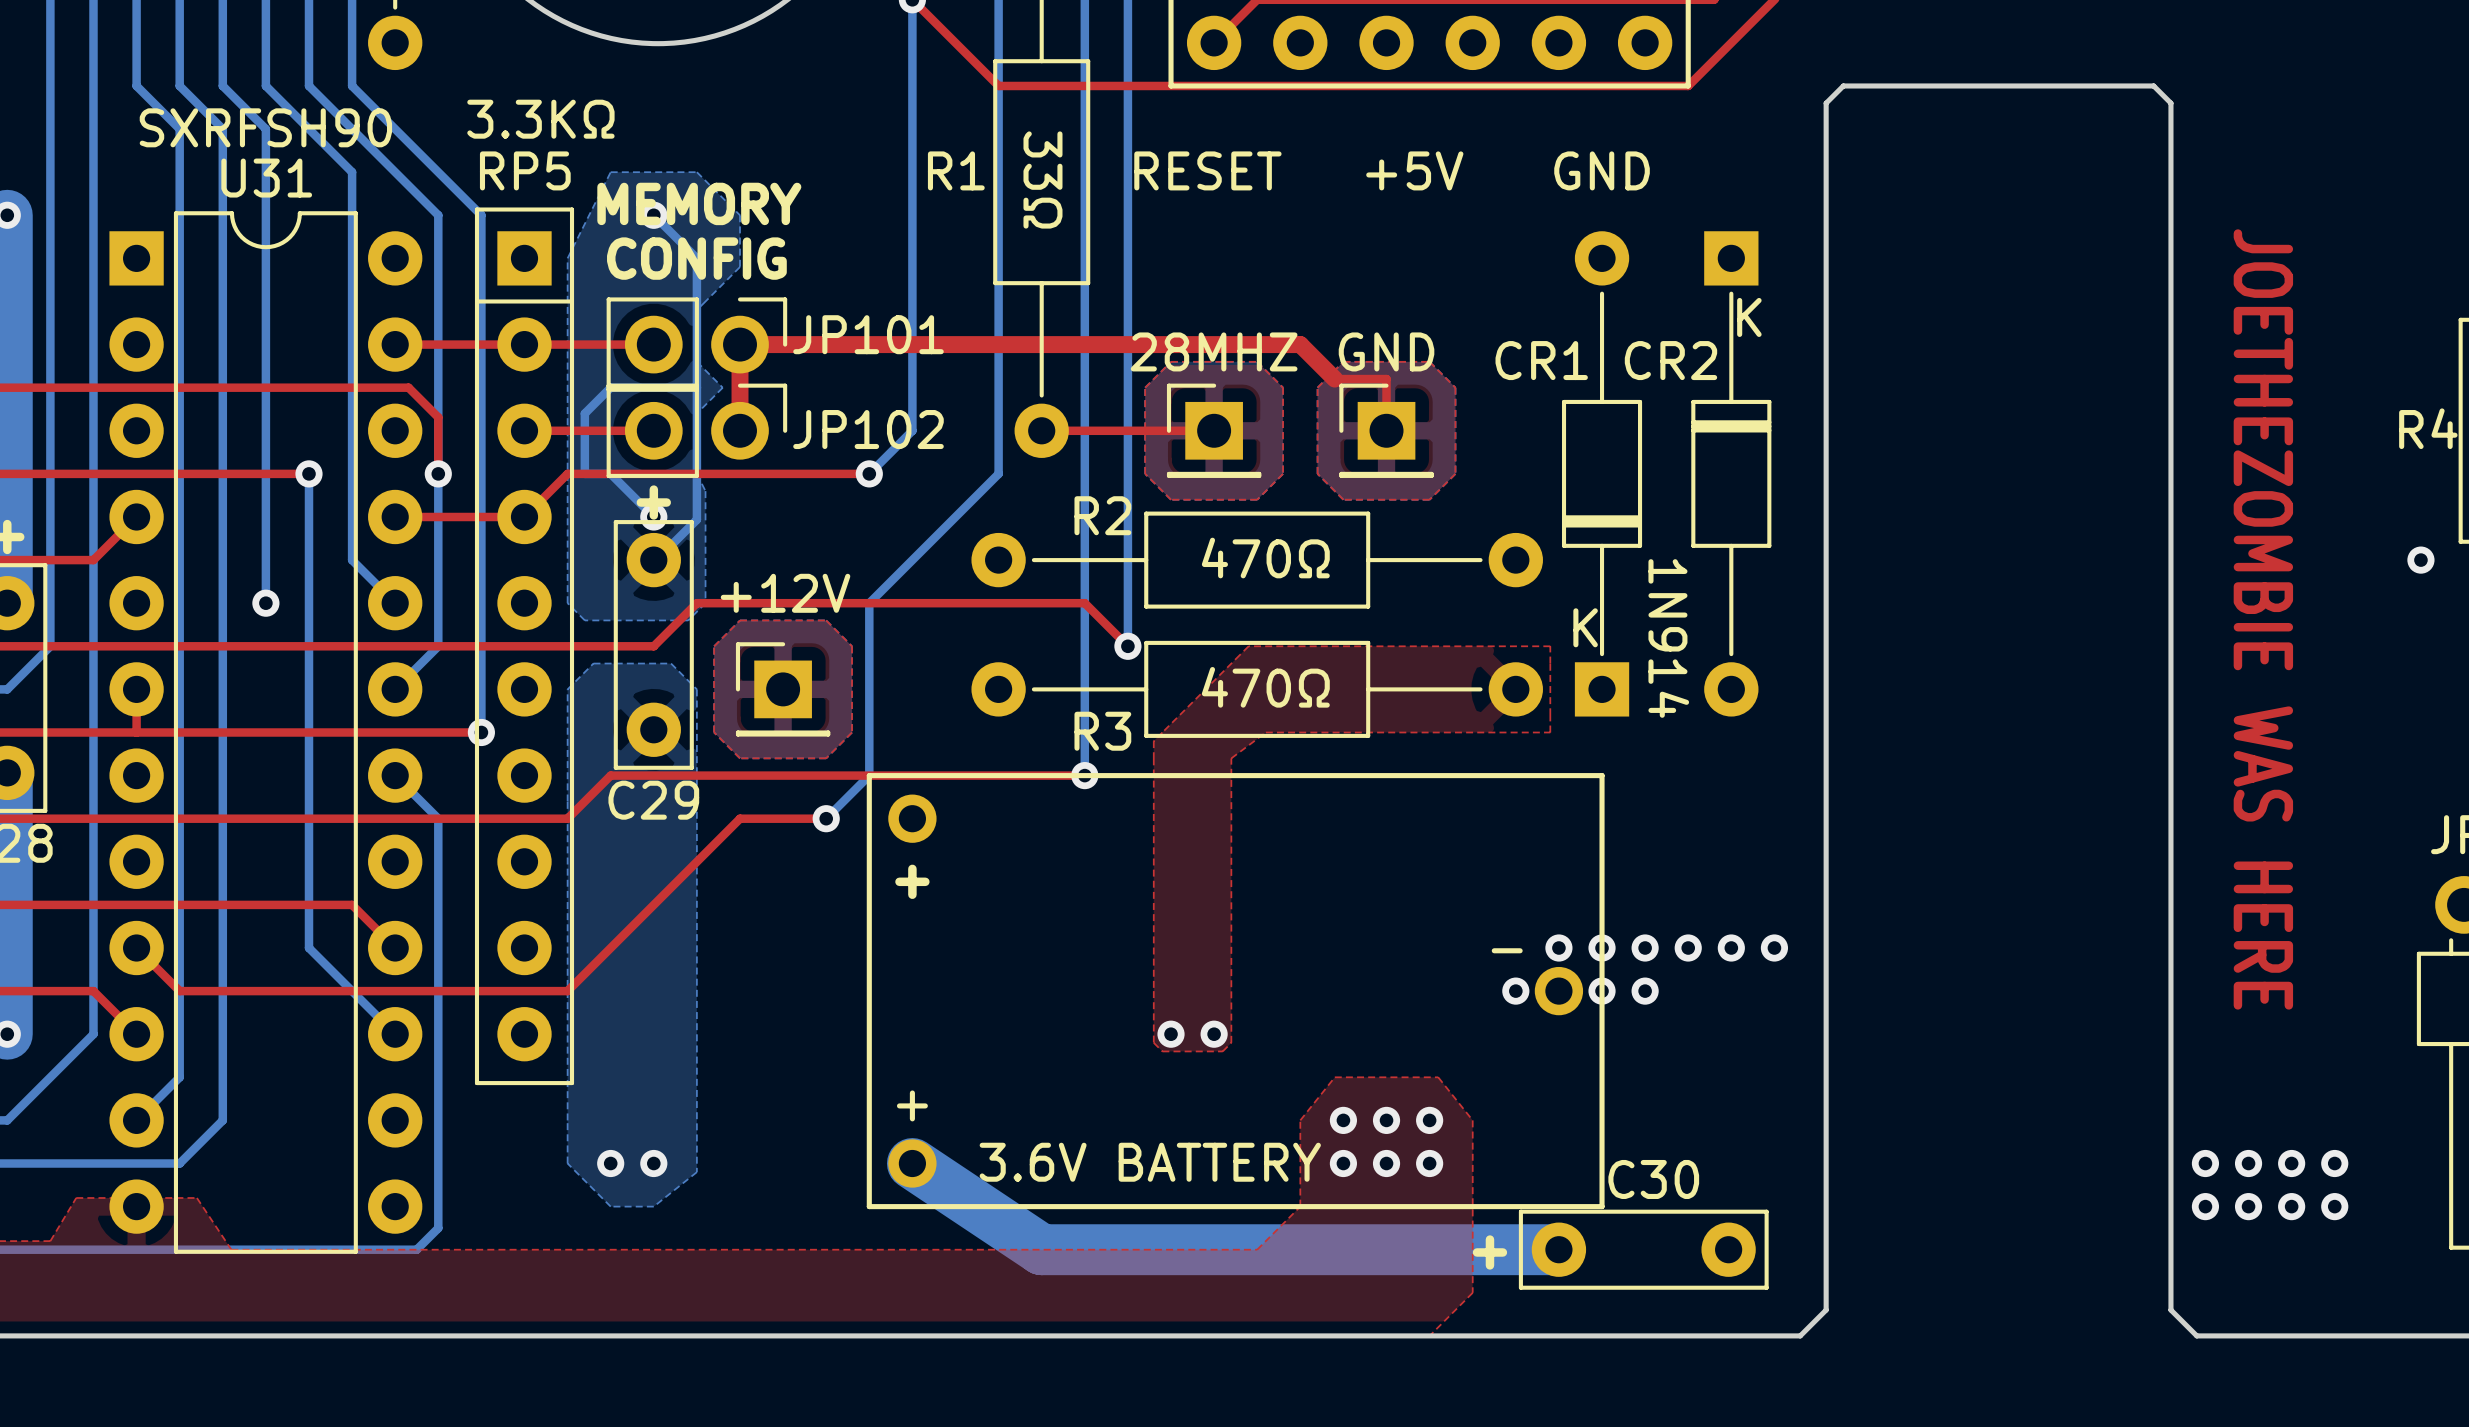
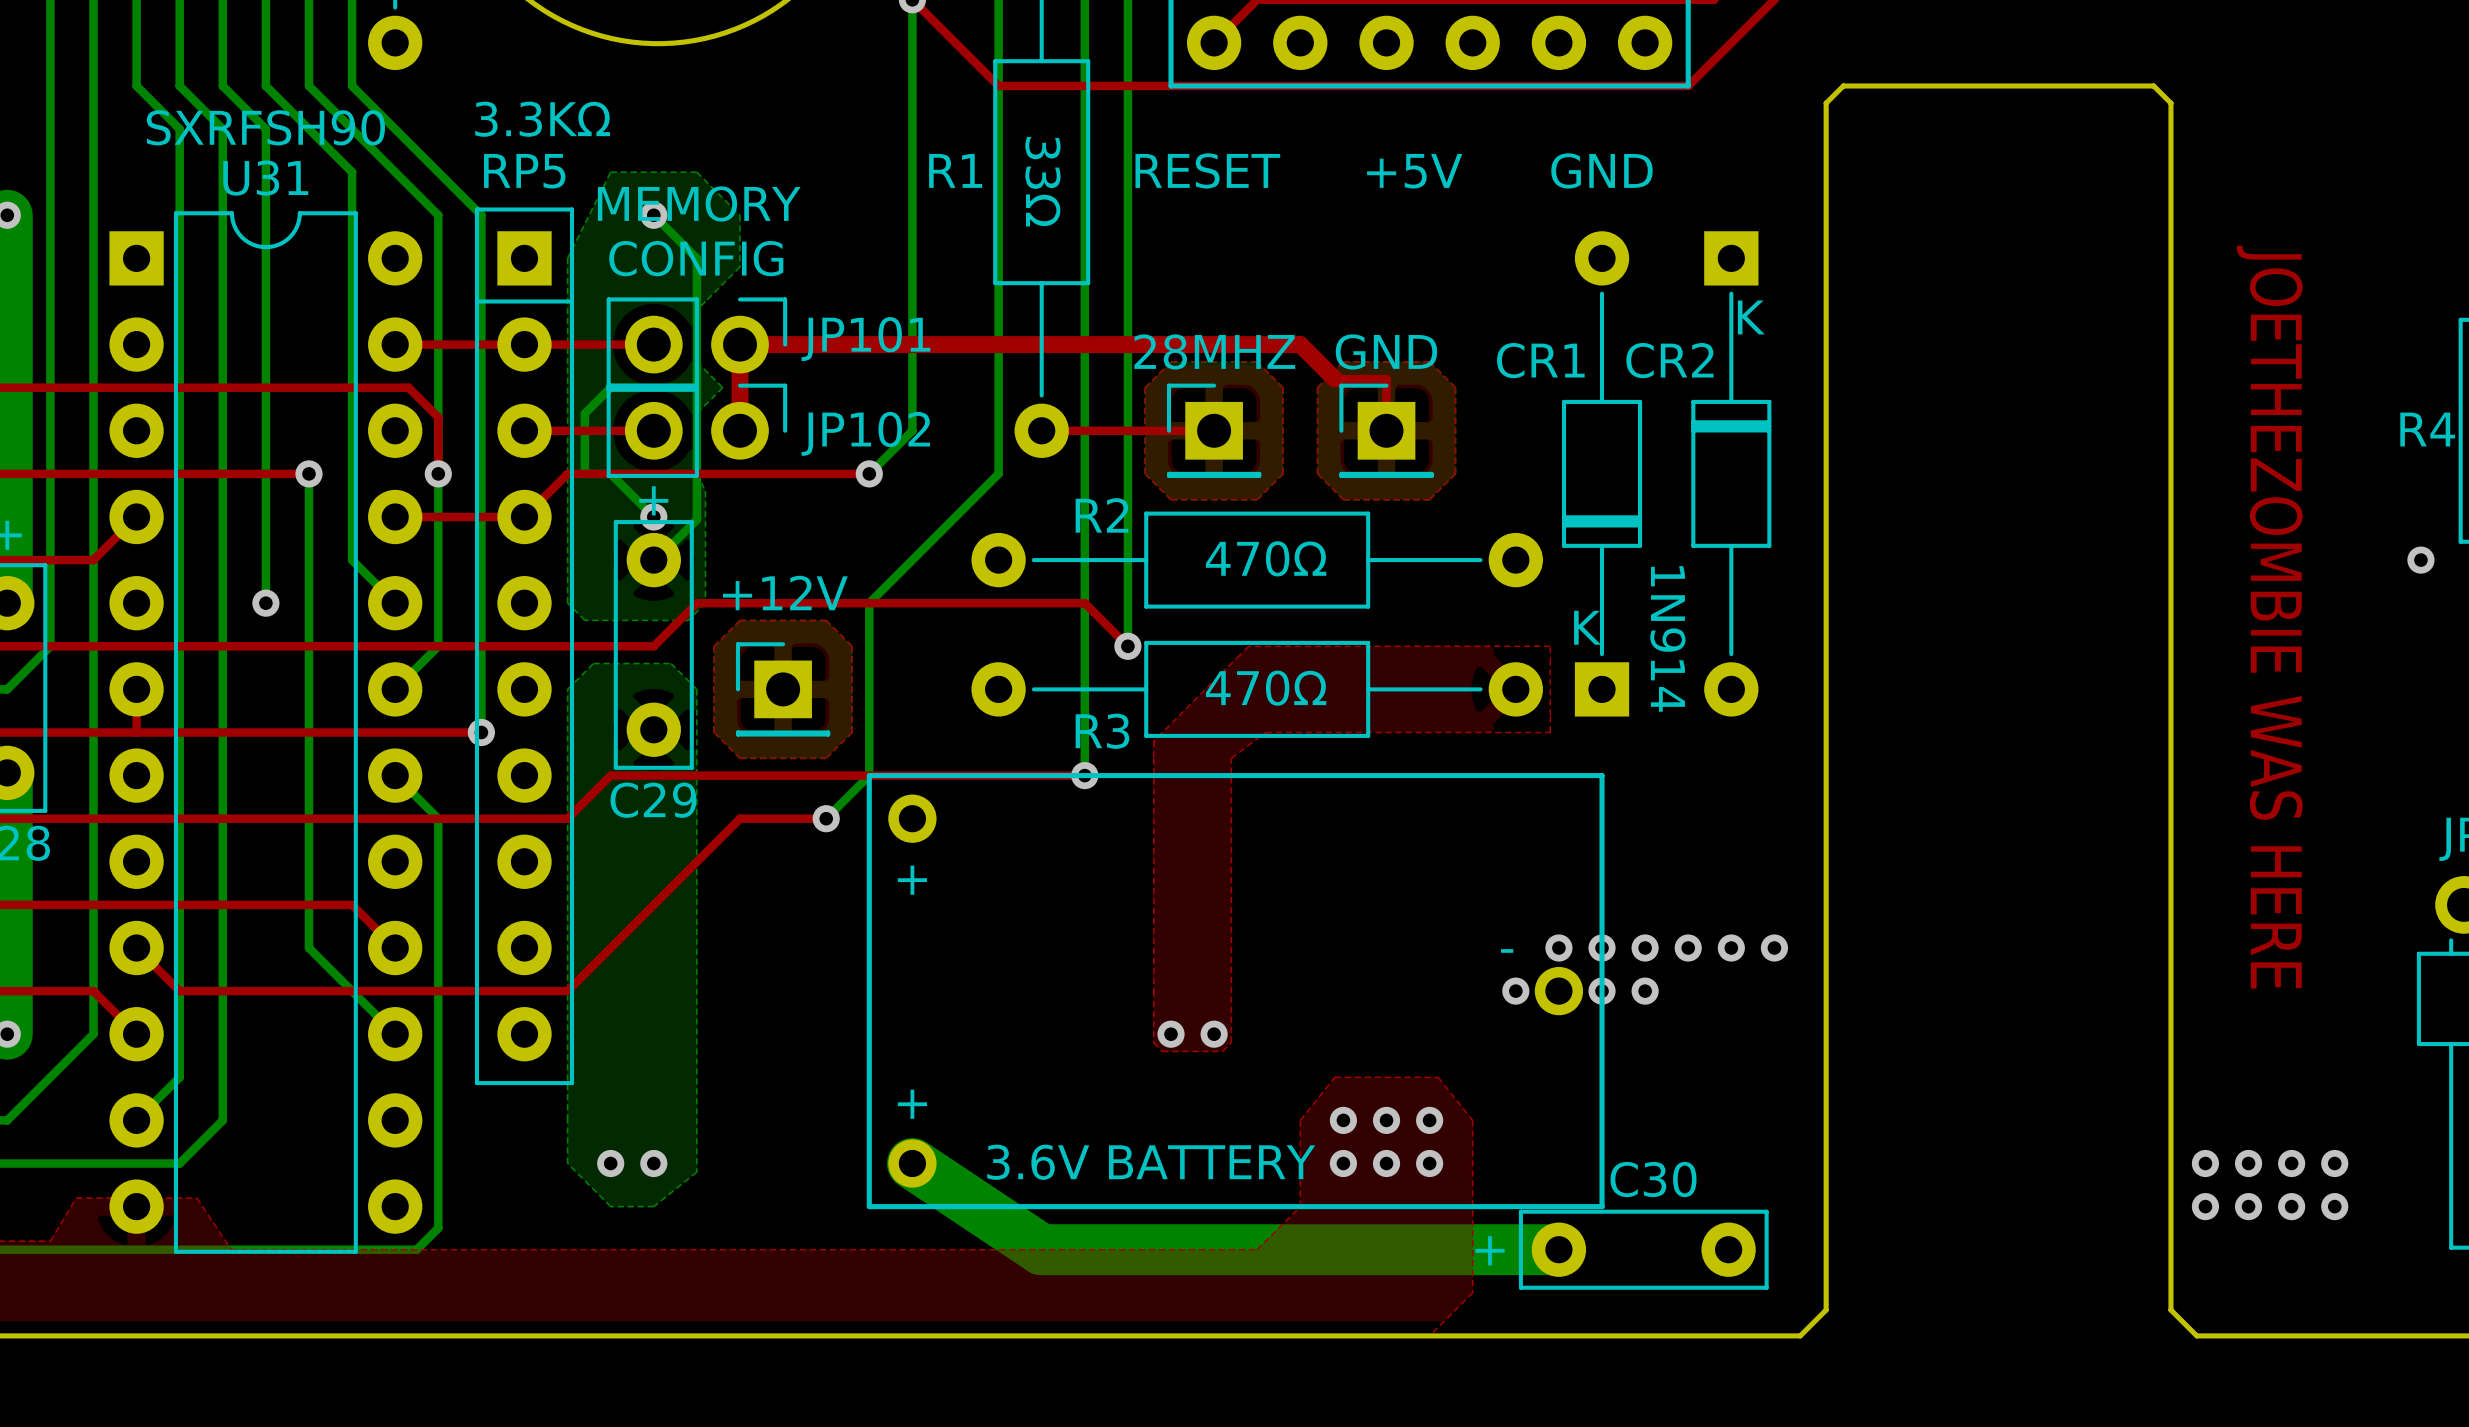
text position: JOETHEZOMBIE WAS HERE (2263, 619) -> JOETHEZOMBIE WAS HERE (2269, 617)

